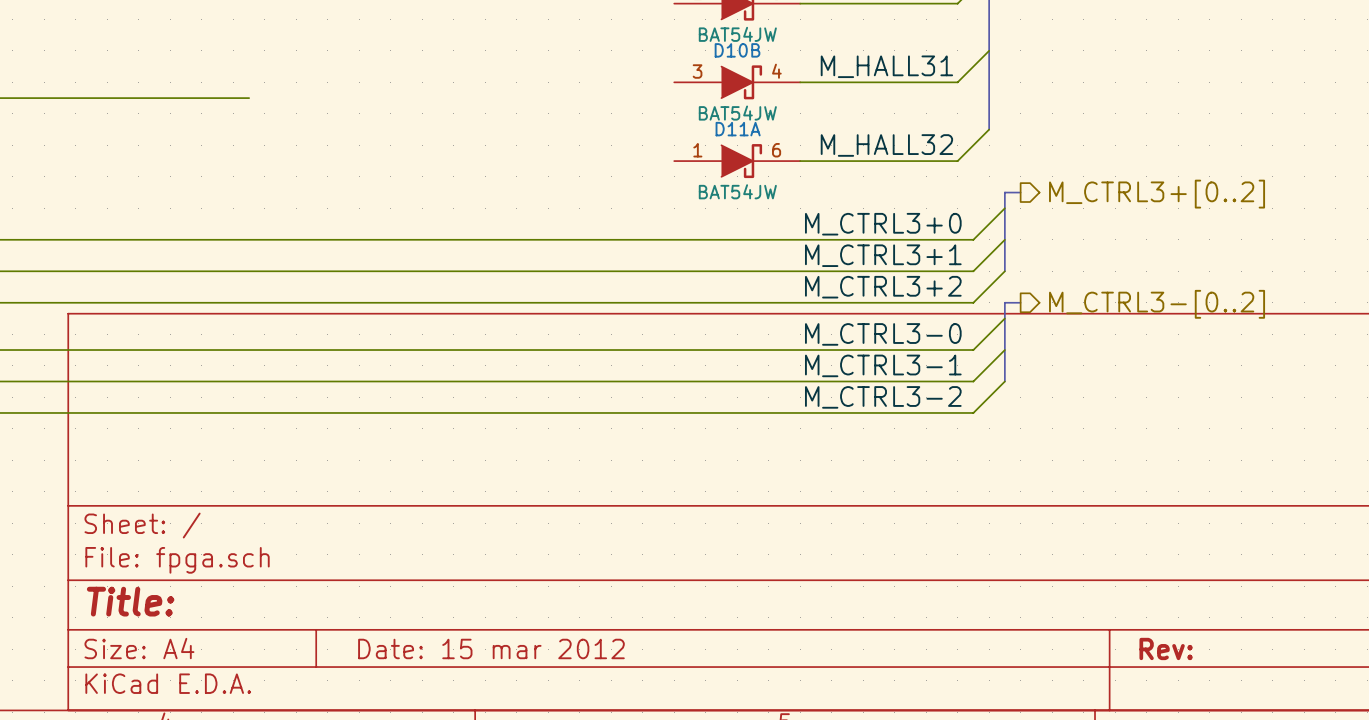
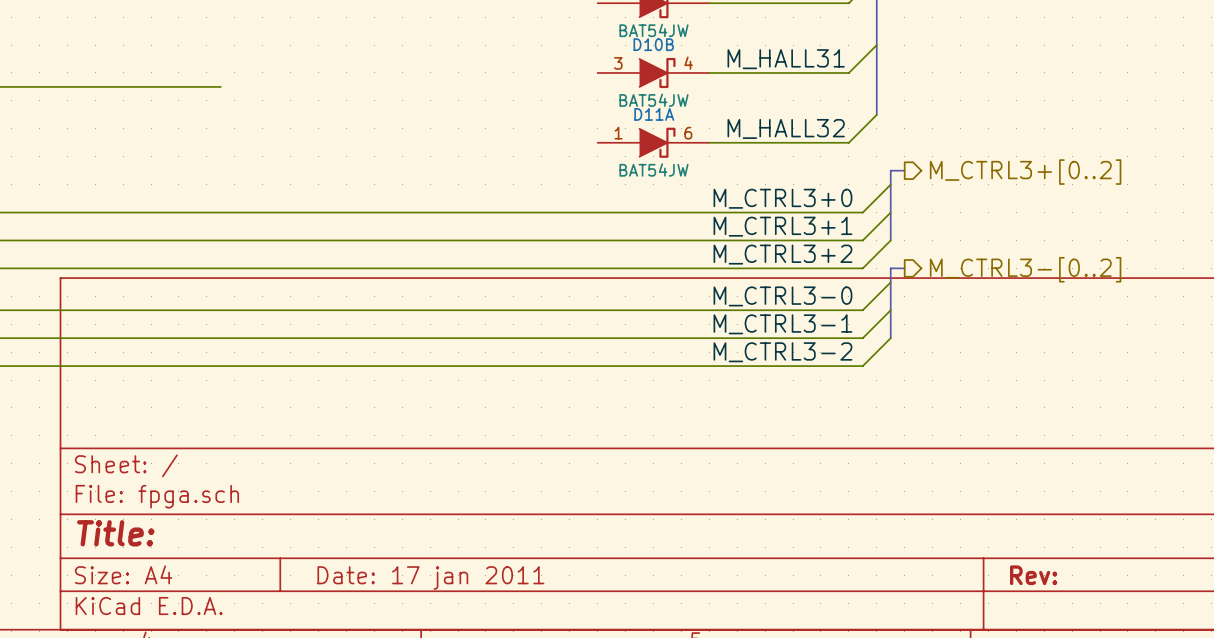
title block: Date: 15 mar 2012 (491, 648) -> Date: 17 jan 2011 (430, 578)

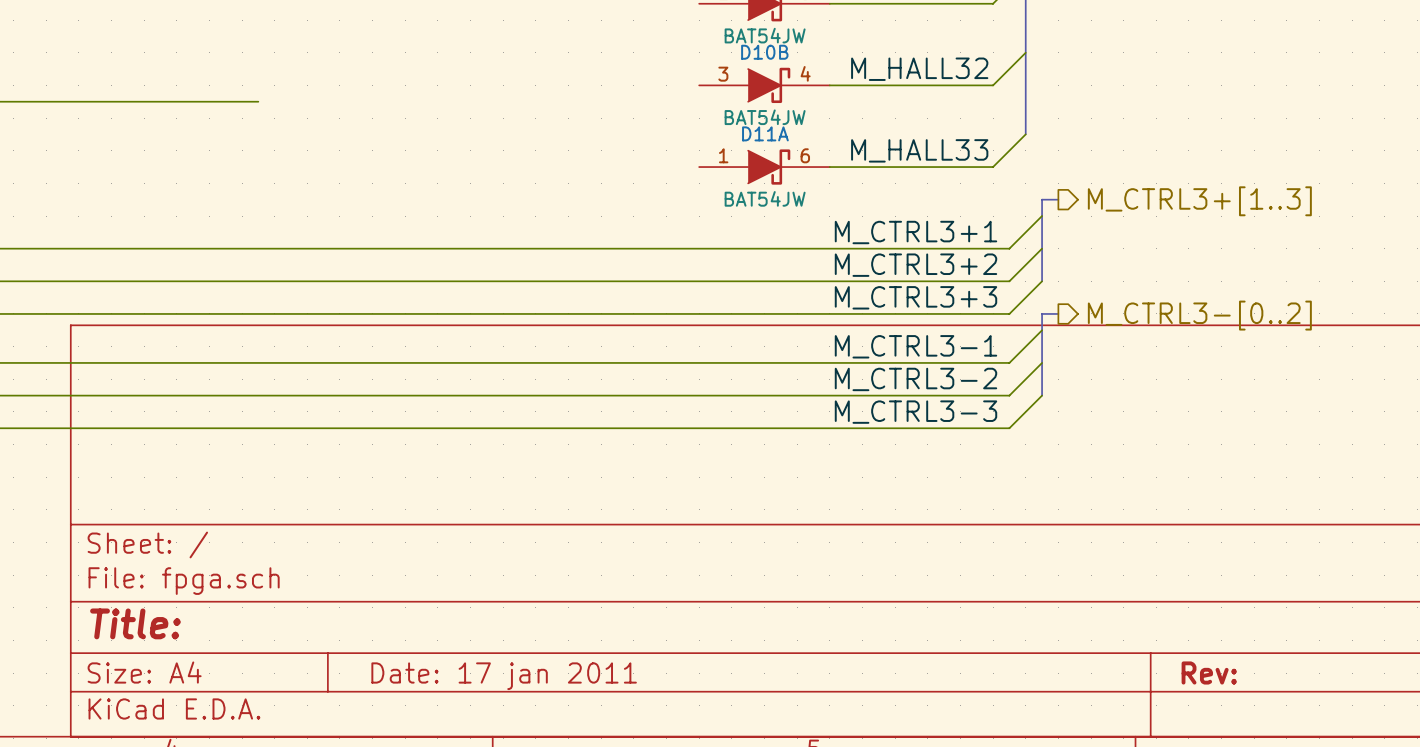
label: M_HALL31 (786, 59) -> M_HALL32 (919, 69)
label: M_HALL32 (786, 128) -> M_HALL33 (919, 150)
hierarchical label: M_CTRL3+[0..2] (1025, 172) -> M_CTRL3+[1..3] (1199, 201)
label: M_CTRL3+0 (782, 198) -> M_CTRL3+1 (915, 232)
label: M_CTRL3+1 (782, 226) -> M_CTRL3+2 (915, 265)
label: M_CTRL3+2 (782, 254) -> M_CTRL3+3 (915, 297)
label: M_CTRL3-0 (782, 296) -> M_CTRL3-1 (915, 346)
label: M_CTRL3-1 (782, 324) -> M_CTRL3-2 (915, 379)
label: M_CTRL3-2 (782, 352) -> M_CTRL3-3 (915, 412)

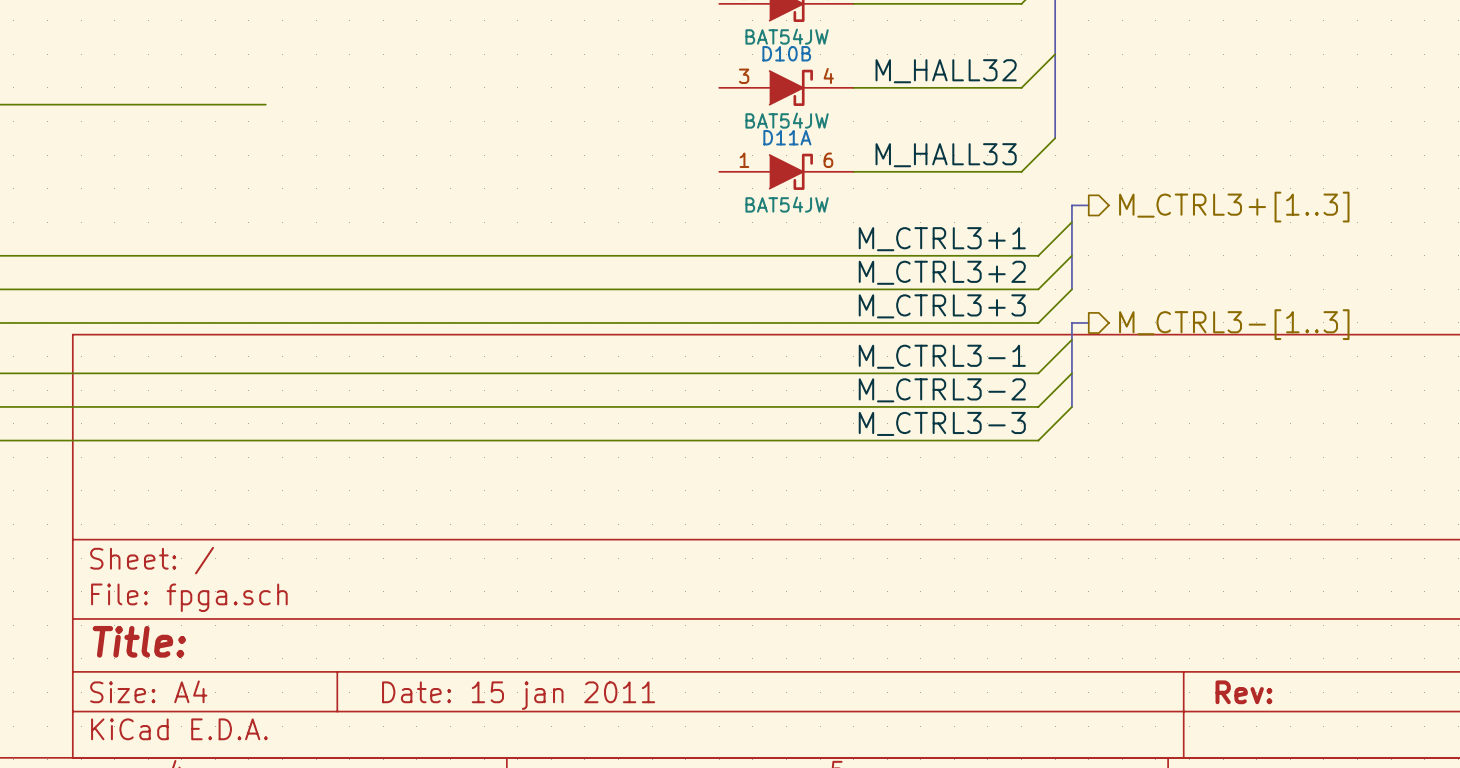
hierarchical label: M_CTRL3-[0..2] (1199, 315) -> M_CTRL3-[1..3] (1234, 324)
title block: Date: 17 jan 2011 (504, 676) -> Date: 15 jan 2011 (518, 695)

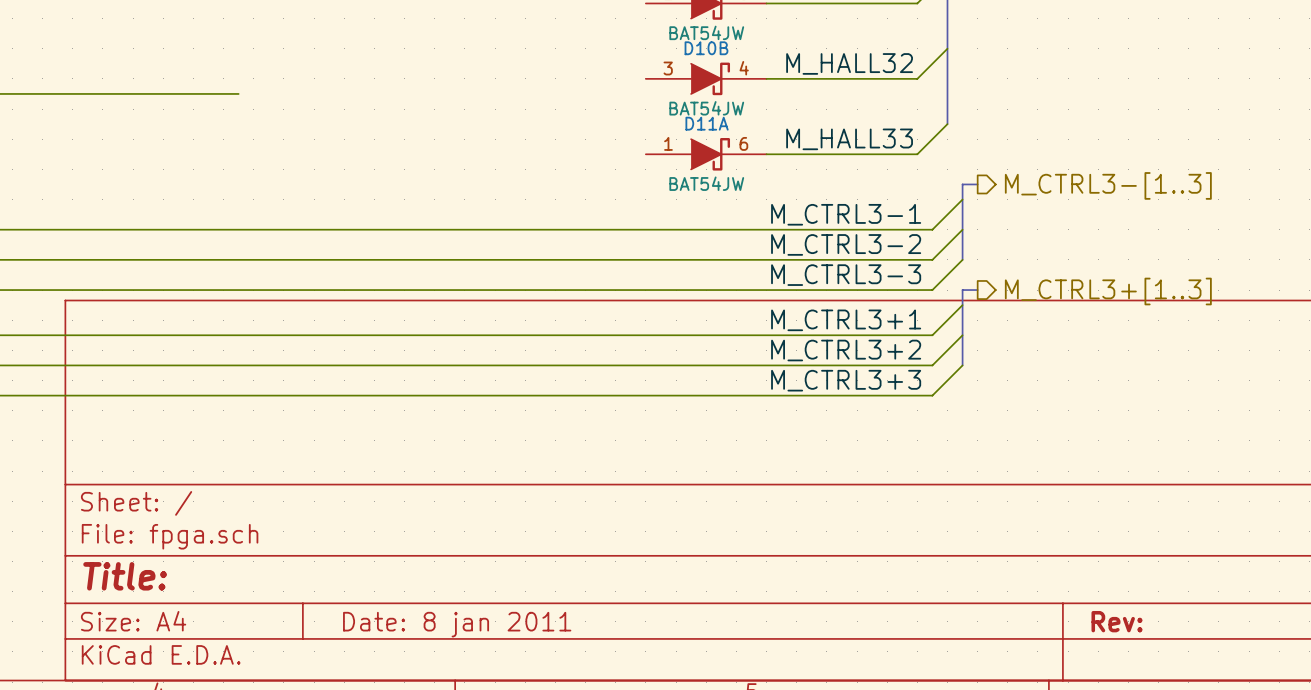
hierarchical label: M_CTRL3+[1..3] (1234, 207) -> M_CTRL3-[1..3] (1108, 185)
label: M_CTRL3+1 (942, 239) -> M_CTRL3-1 (846, 214)
label: M_CTRL3+2 (942, 272) -> M_CTRL3-2 (846, 244)
label: M_CTRL3+3 (942, 306) -> M_CTRL3-3 (846, 275)
hierarchical label: M_CTRL3-[1..3] (1234, 324) -> M_CTRL3+[1..3] (1108, 291)
label: M_CTRL3-1 (942, 356) -> M_CTRL3+1 (846, 320)
label: M_CTRL3-2 (942, 390) -> M_CTRL3+2 (846, 350)
label: M_CTRL3-3 (942, 423) -> M_CTRL3+3 (846, 380)
title block: Date: 15 jan 2011 (518, 695) -> Date: 8 jan 2011 (457, 624)

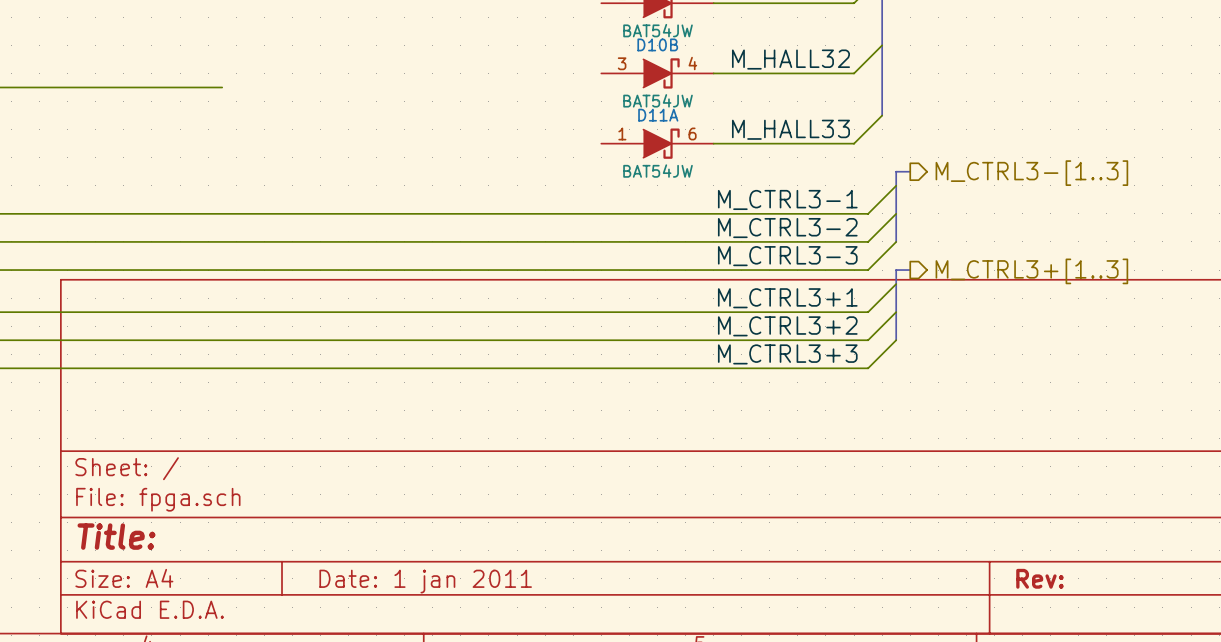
title block: Date: 8 jan 2011 (457, 624) -> Date: 1 jan 2011 (425, 581)

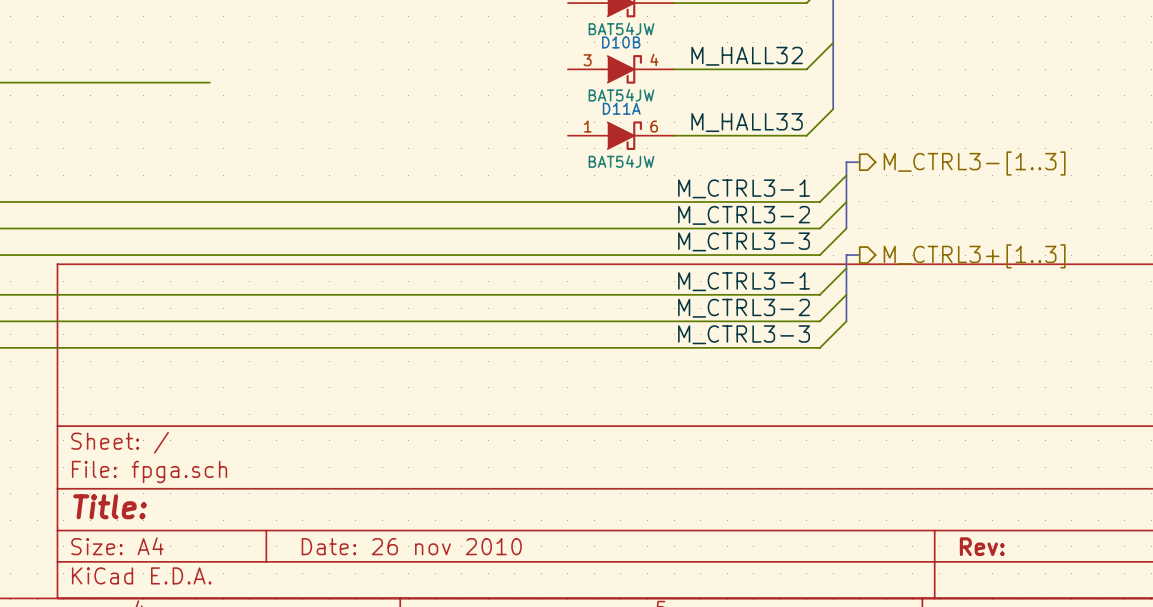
label: M_CTRL3+1 (787, 298) -> M_CTRL3-1 (744, 281)
label: M_CTRL3+2 (787, 326) -> M_CTRL3-2 (744, 308)
label: M_CTRL3+3 (787, 354) -> M_CTRL3-3 (744, 334)
title block: Date: 1 jan 2011 (425, 581) -> Date: 26 nov 2010 (411, 546)

